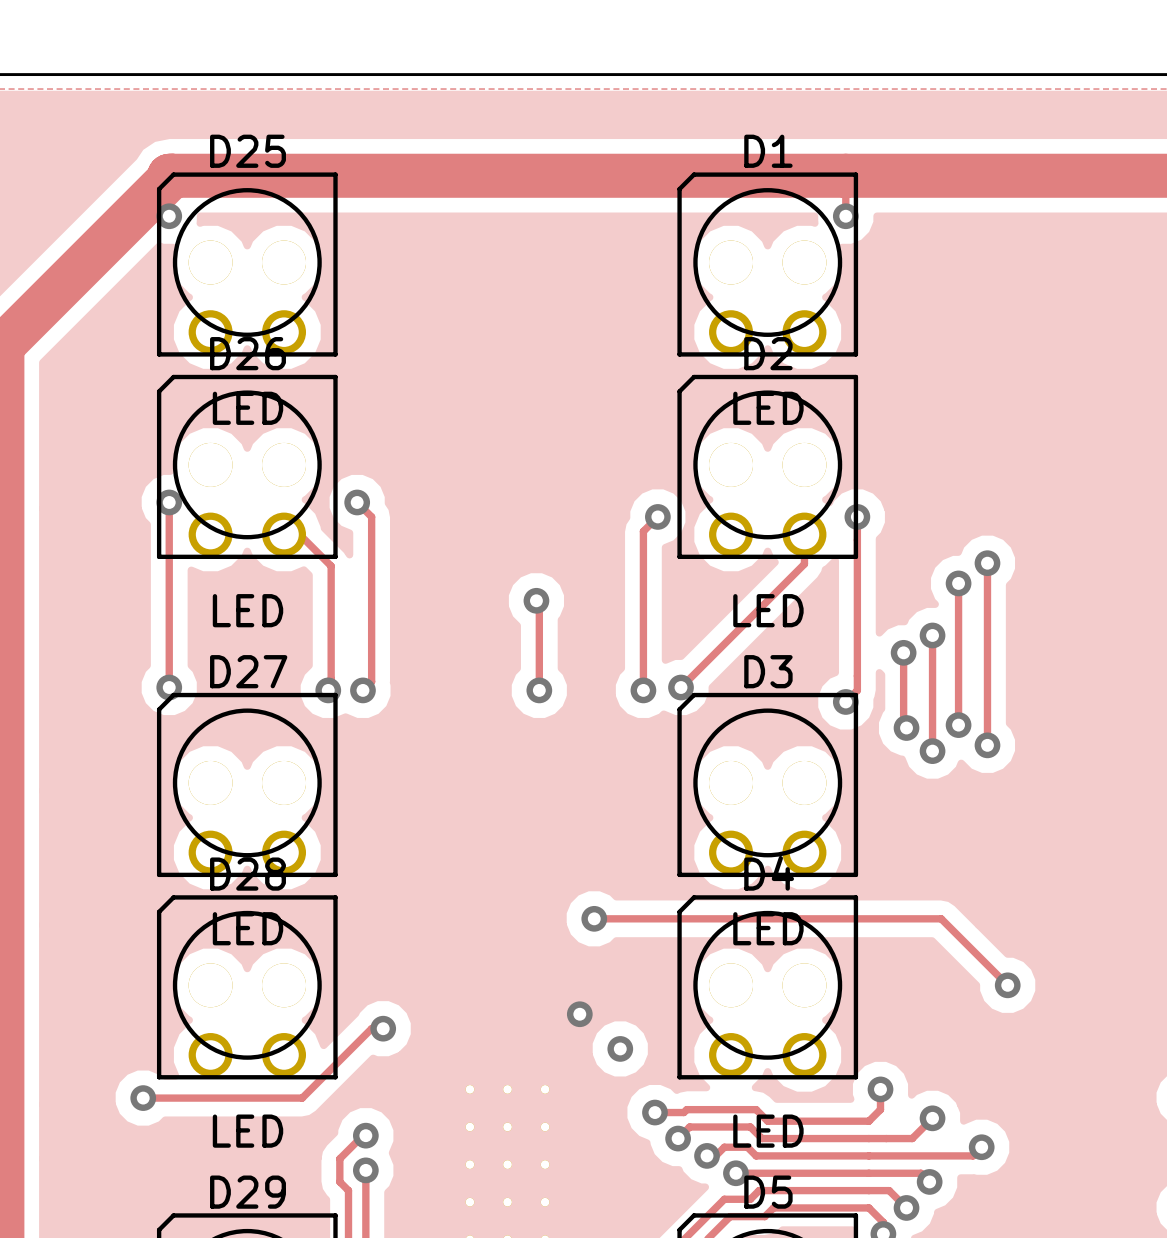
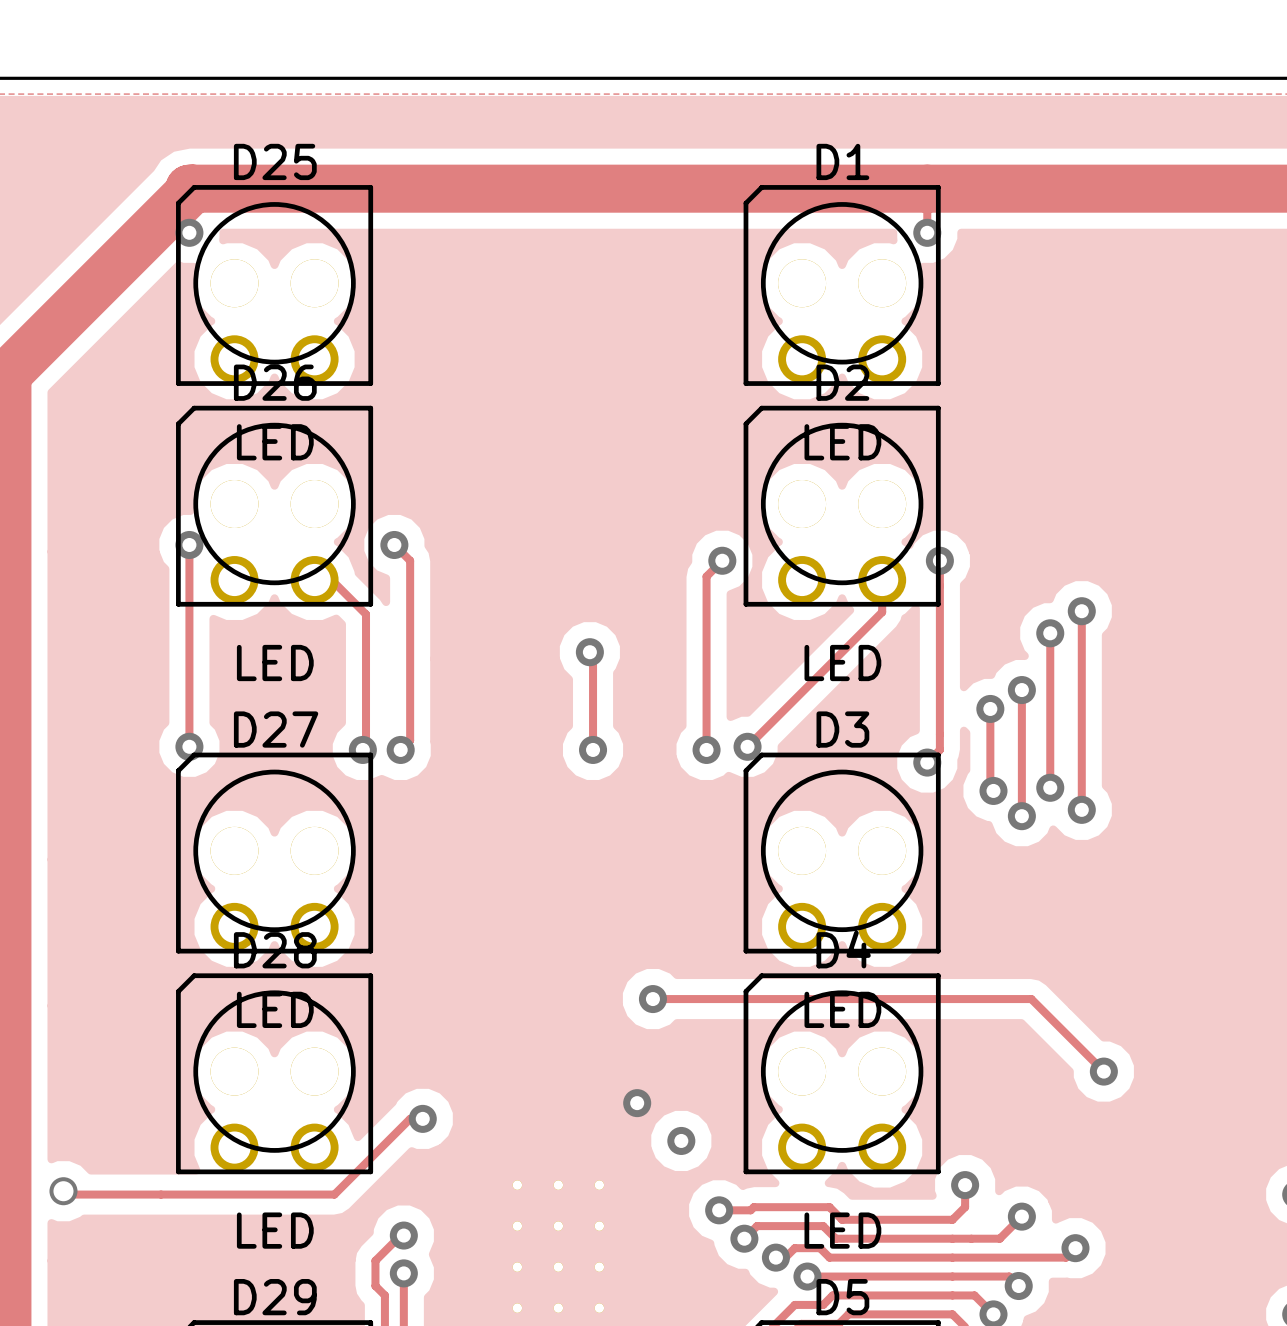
track: none -> (63, 1191) (66, 1194) (161, 1194)
via: none -> (63, 1191)
via: (143, 1098) -> none

